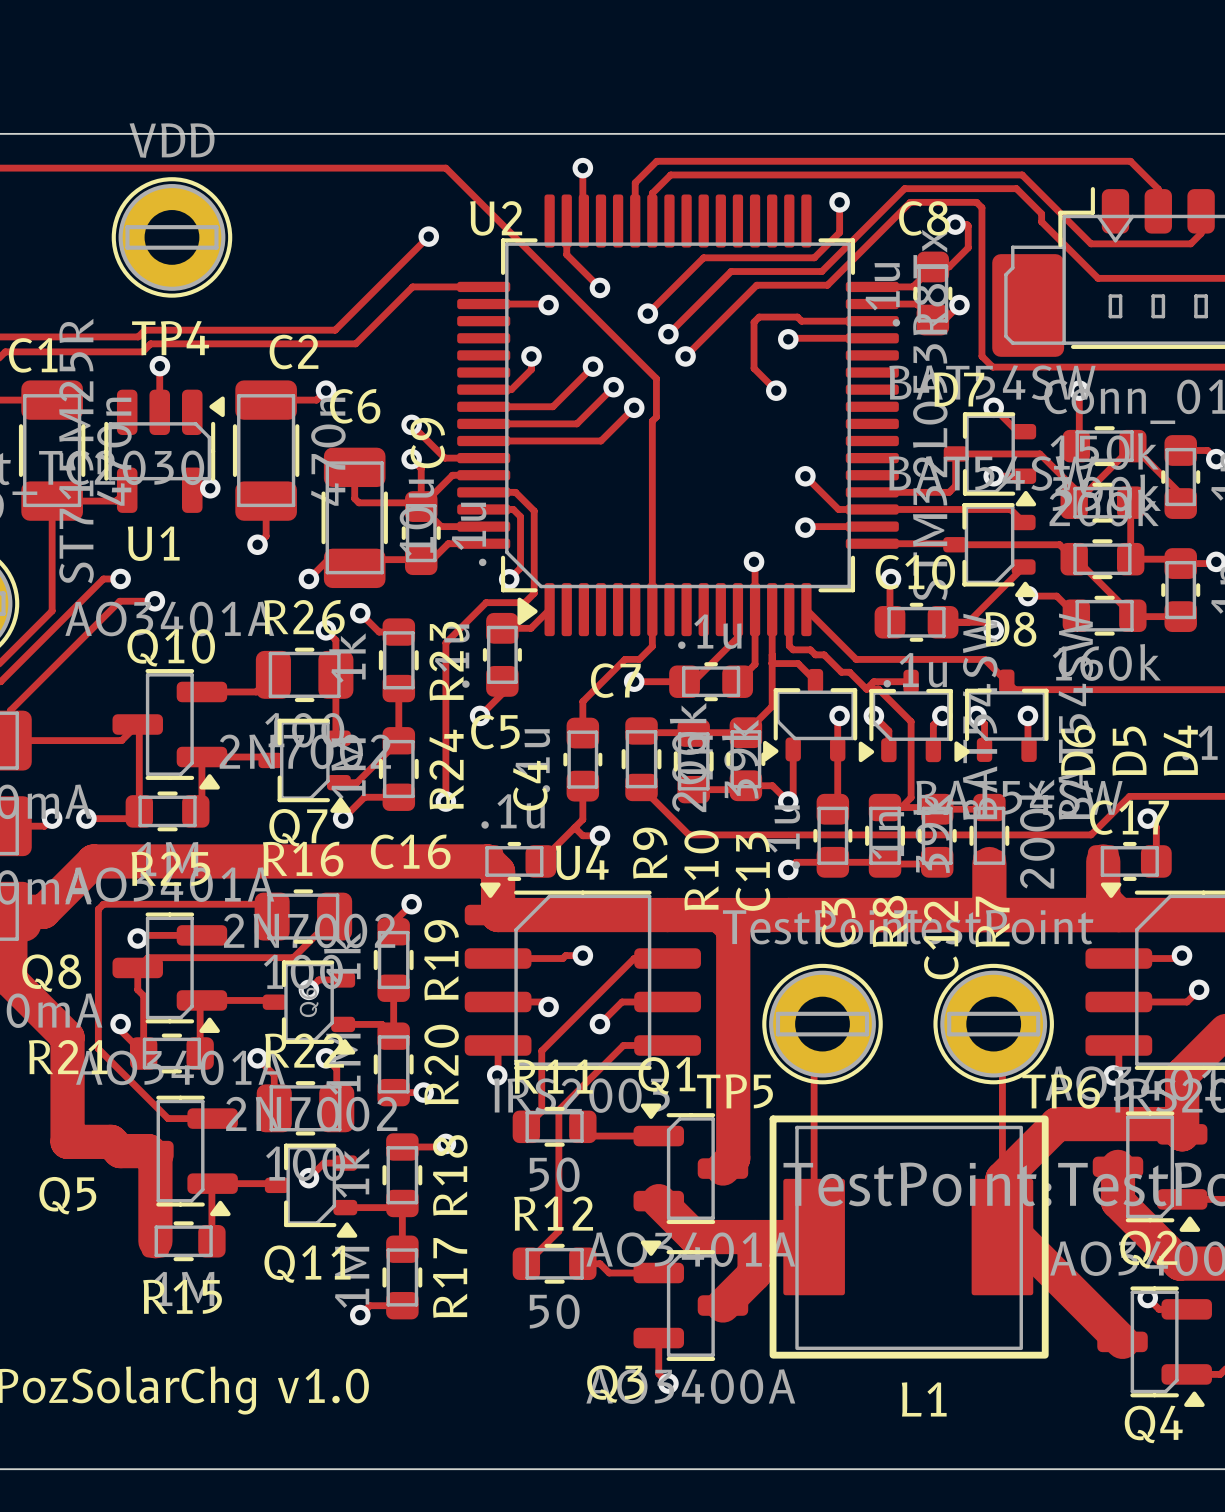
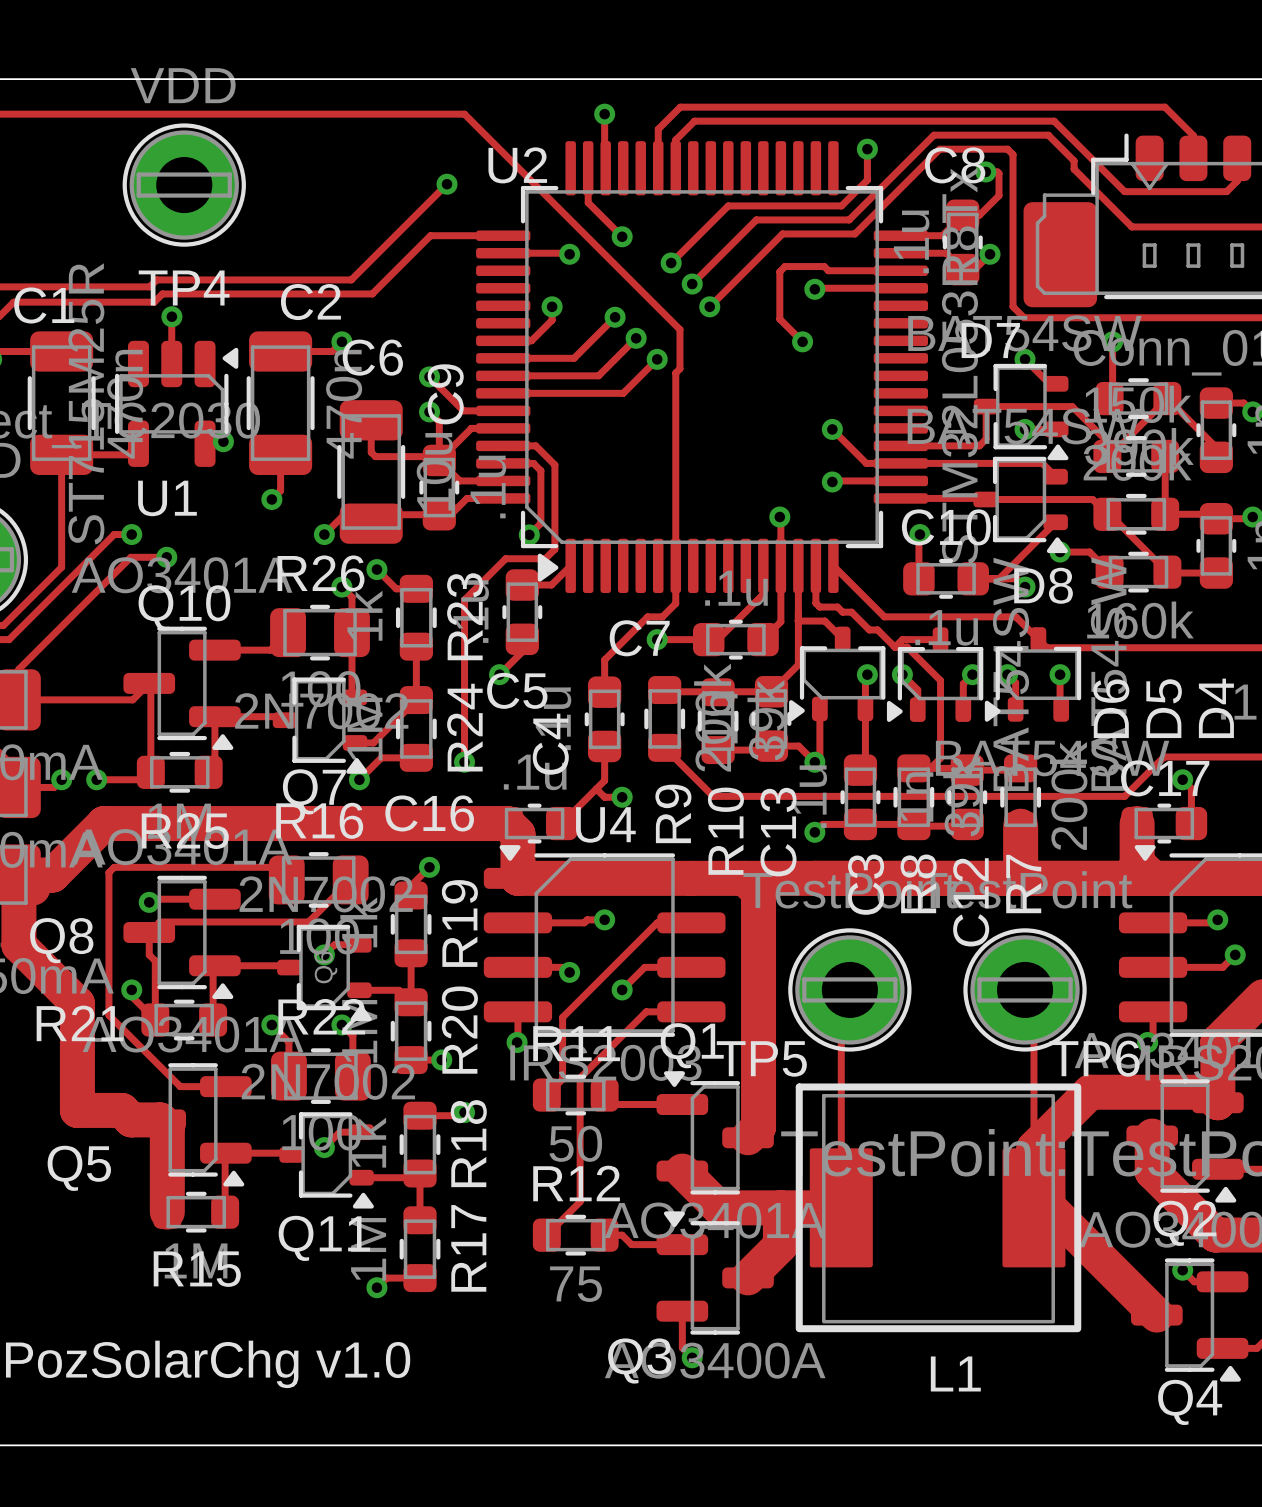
R12 value: 50 (554, 1311) -> 75 (575, 1284)

